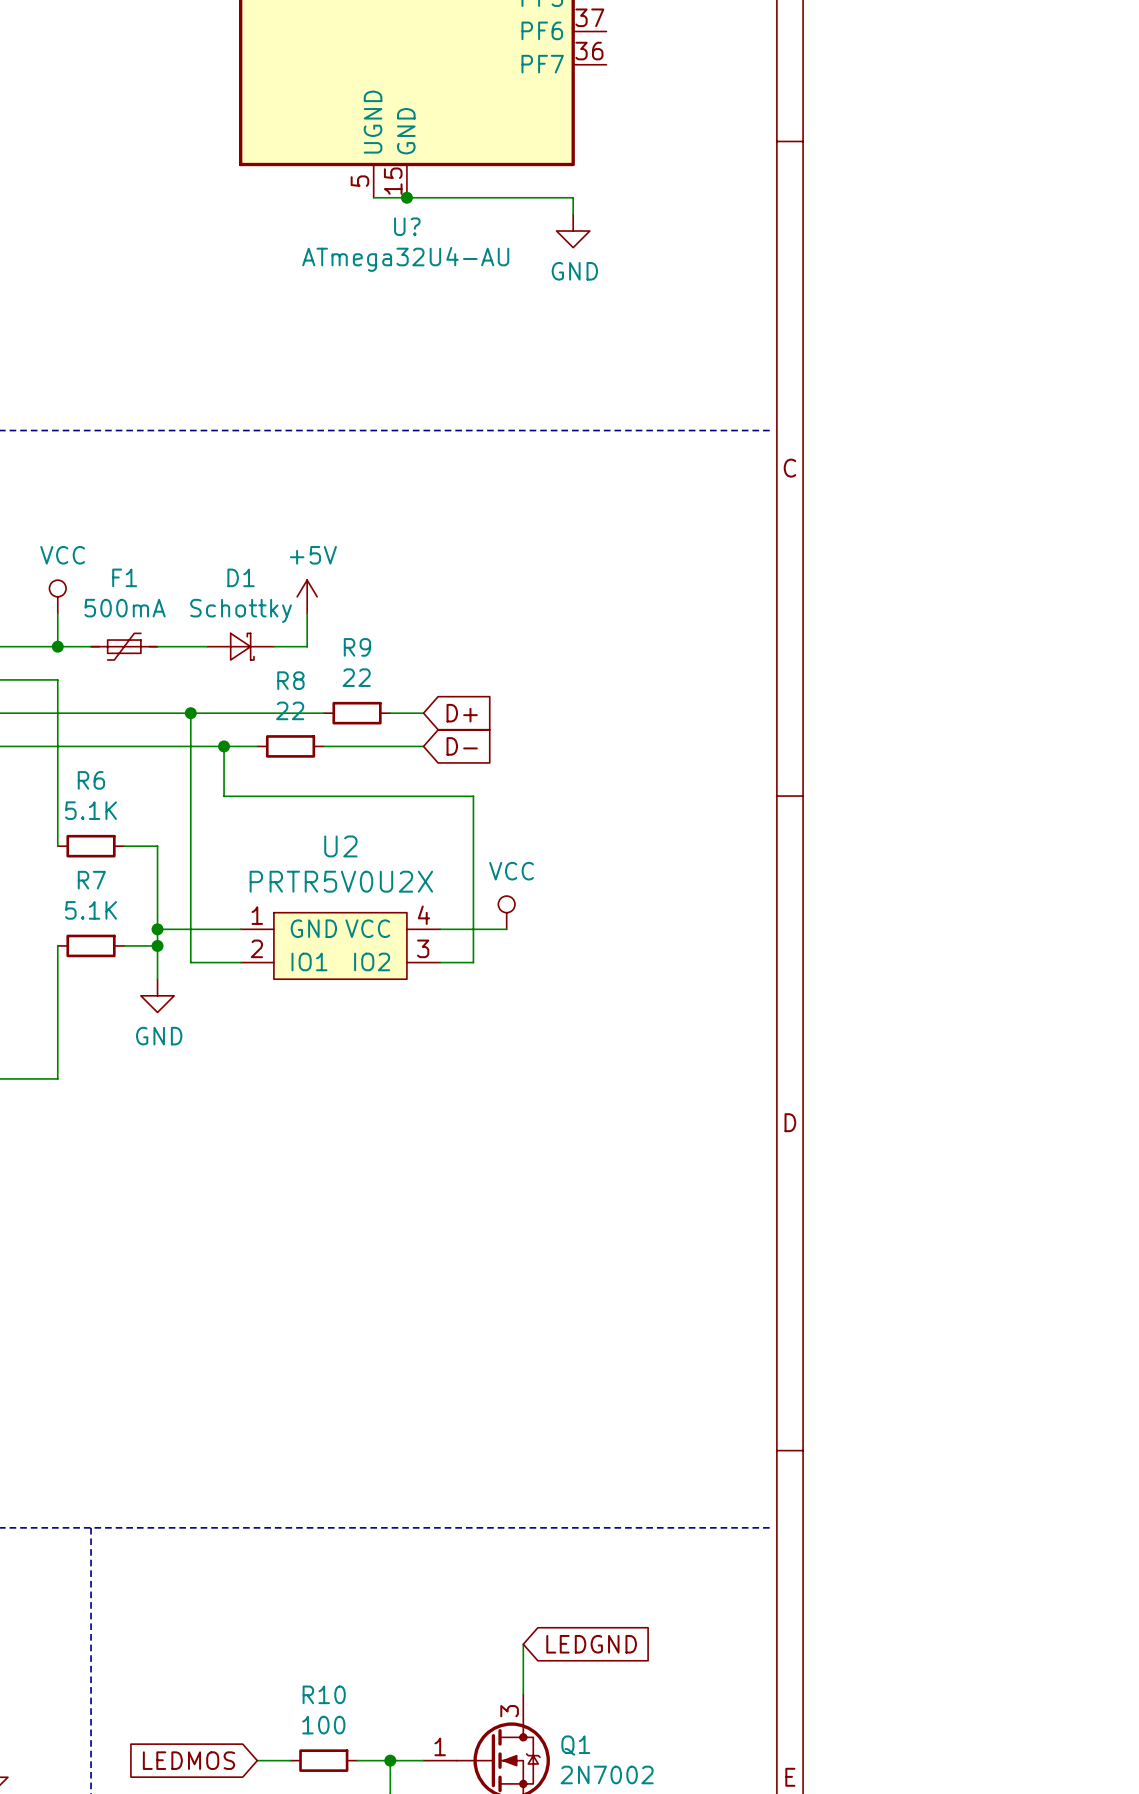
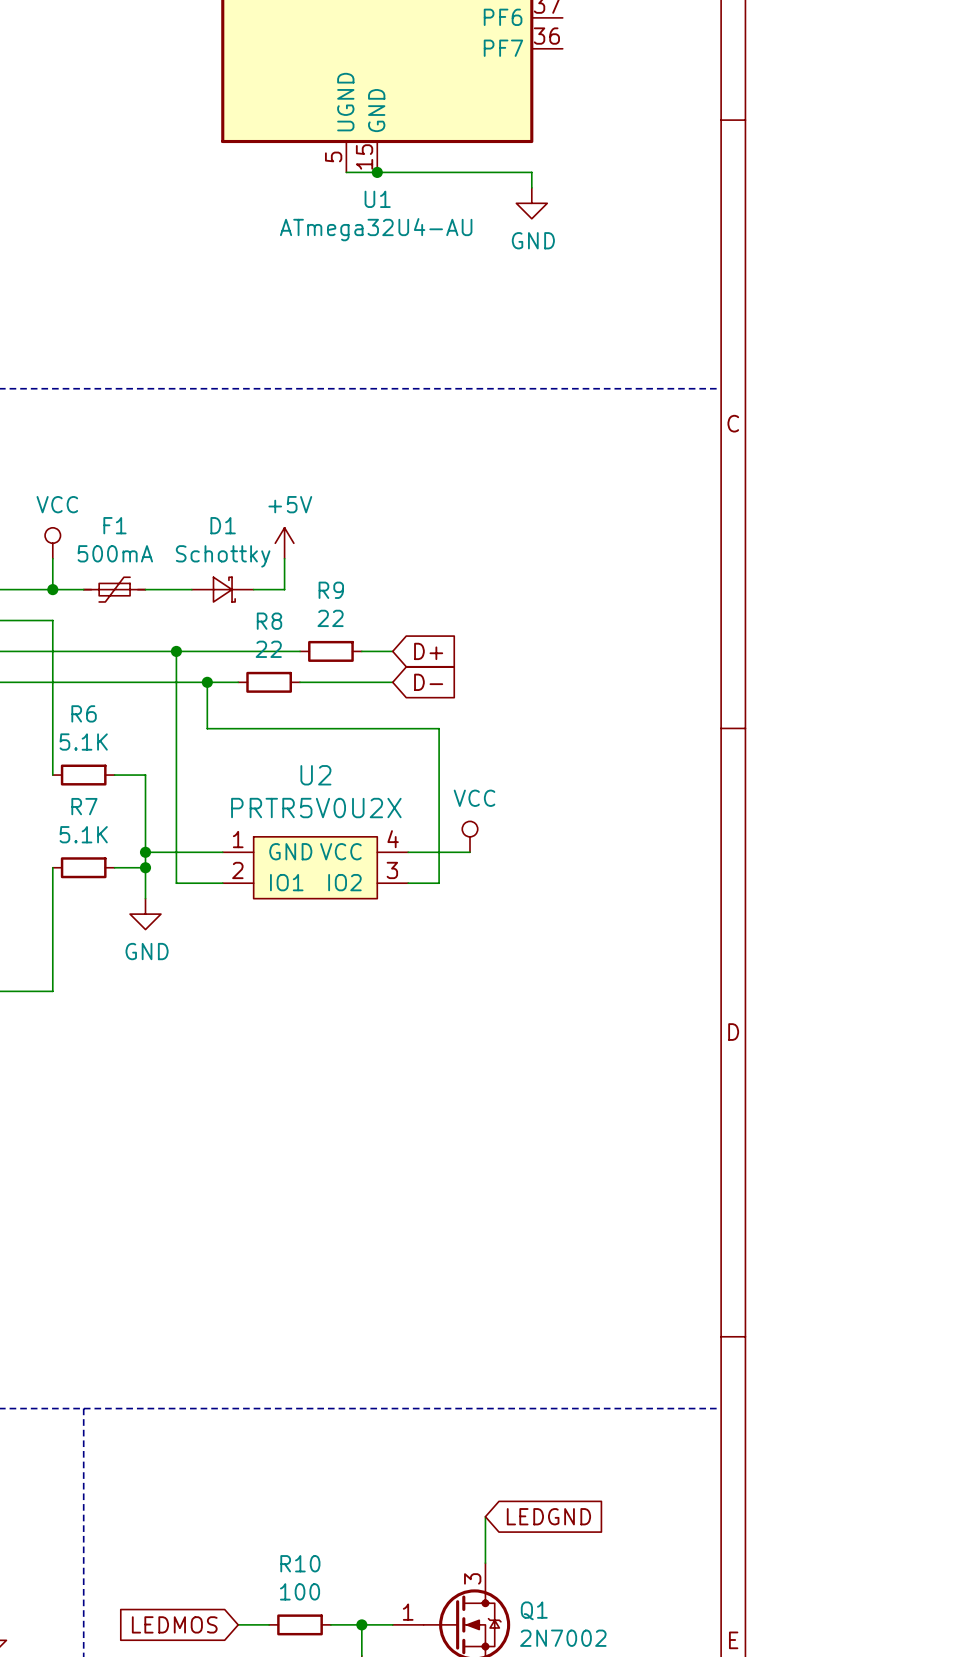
U? name: U? (407, 226) -> U1 (377, 199)

